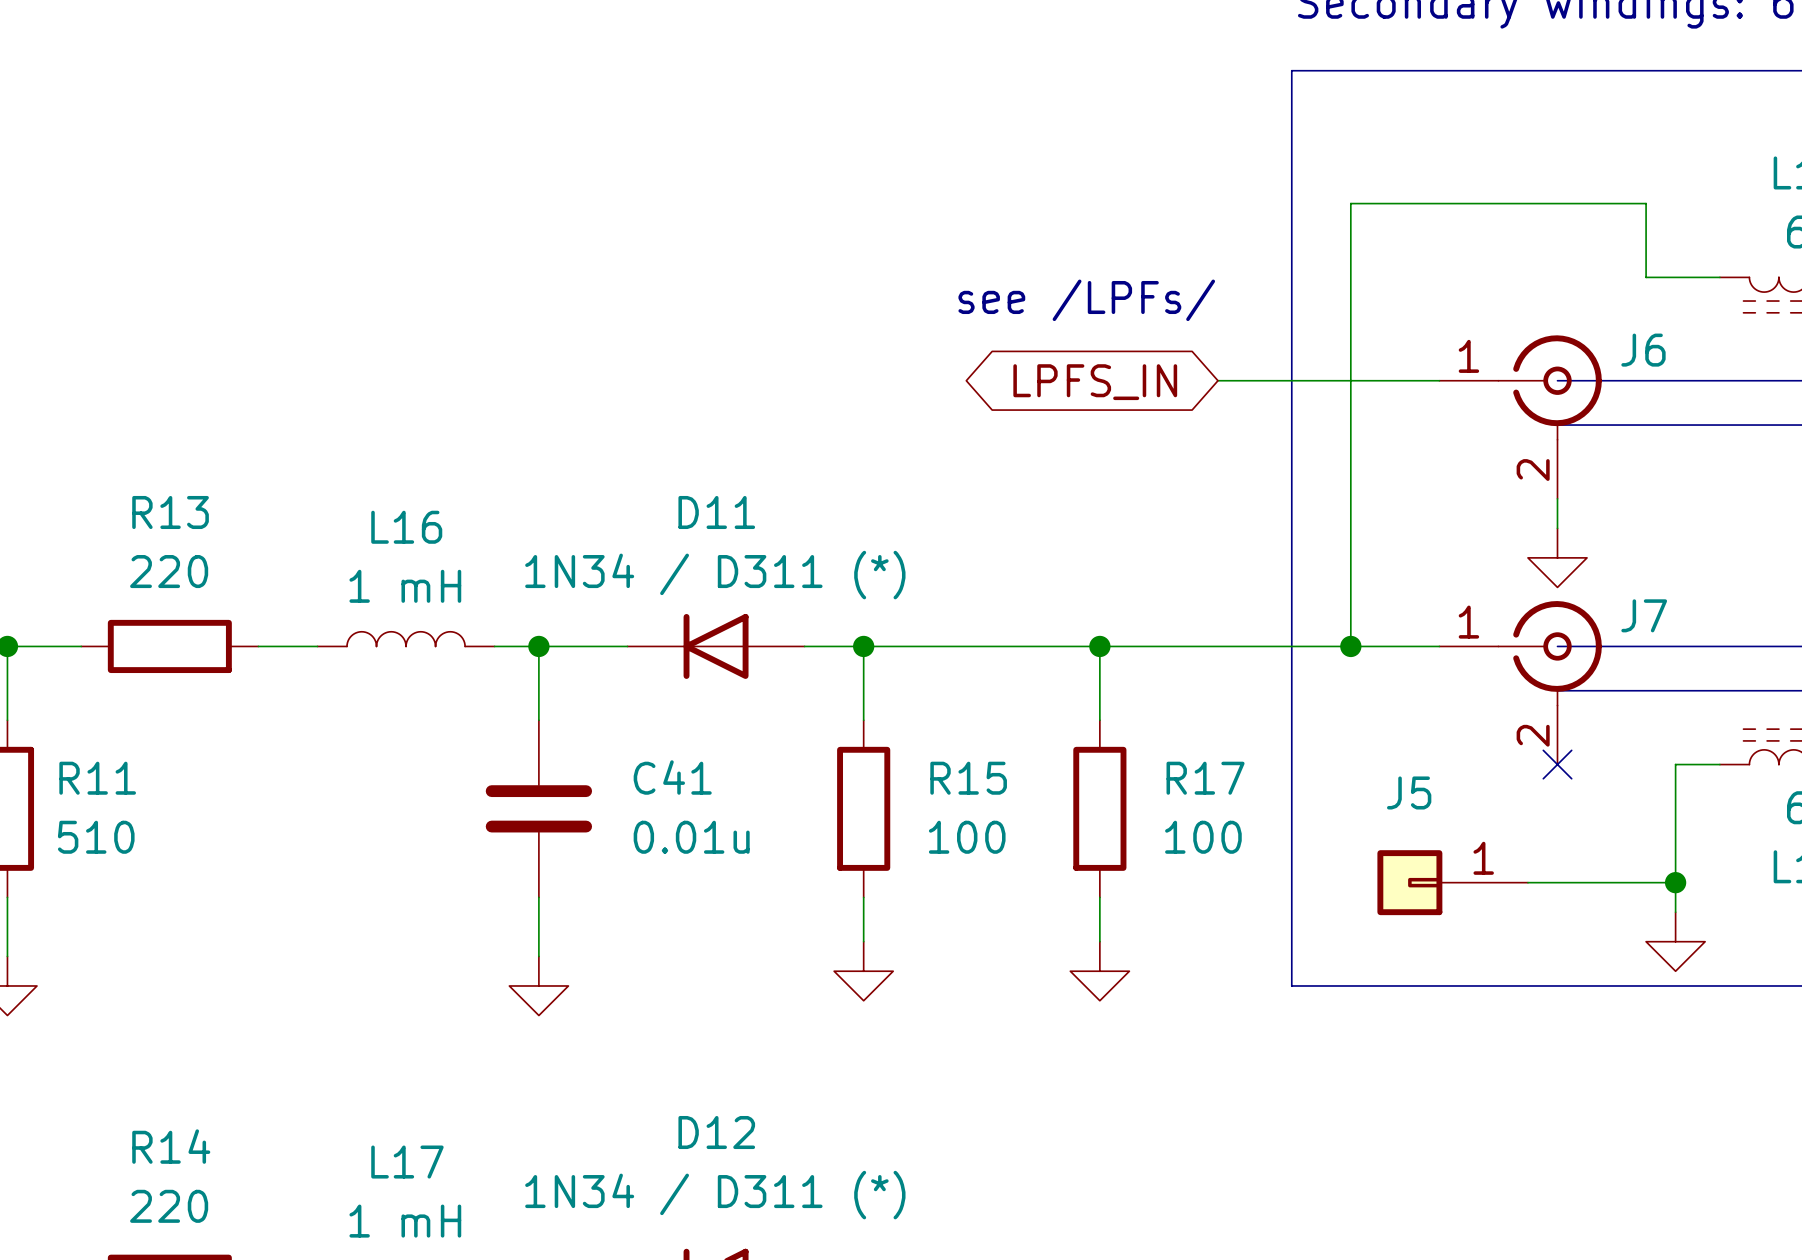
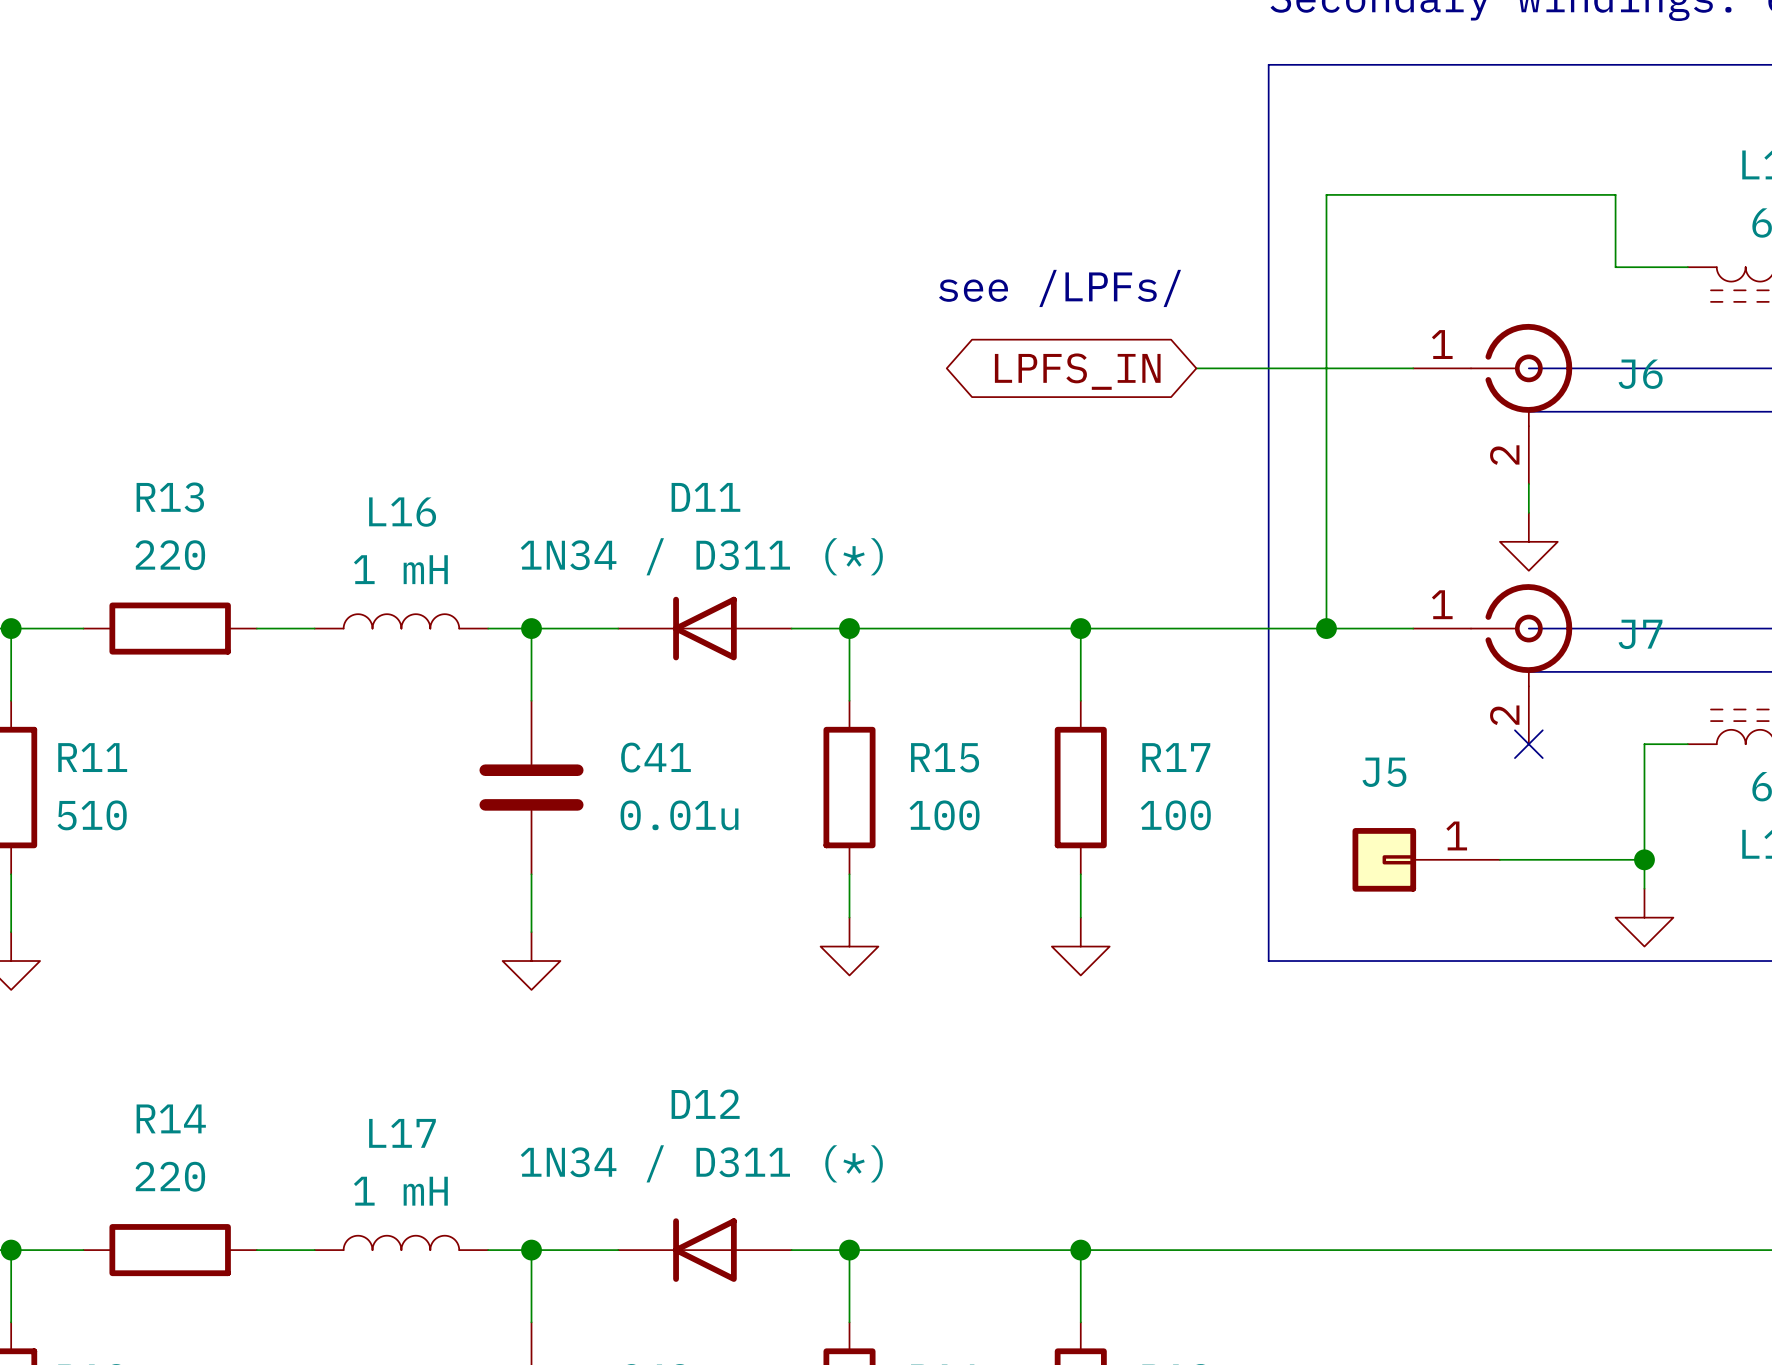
J6 name position: J6 (1643, 350) -> J6 (1640, 374)
J7 name position: J7 (1644, 615) -> J7 (1640, 634)

